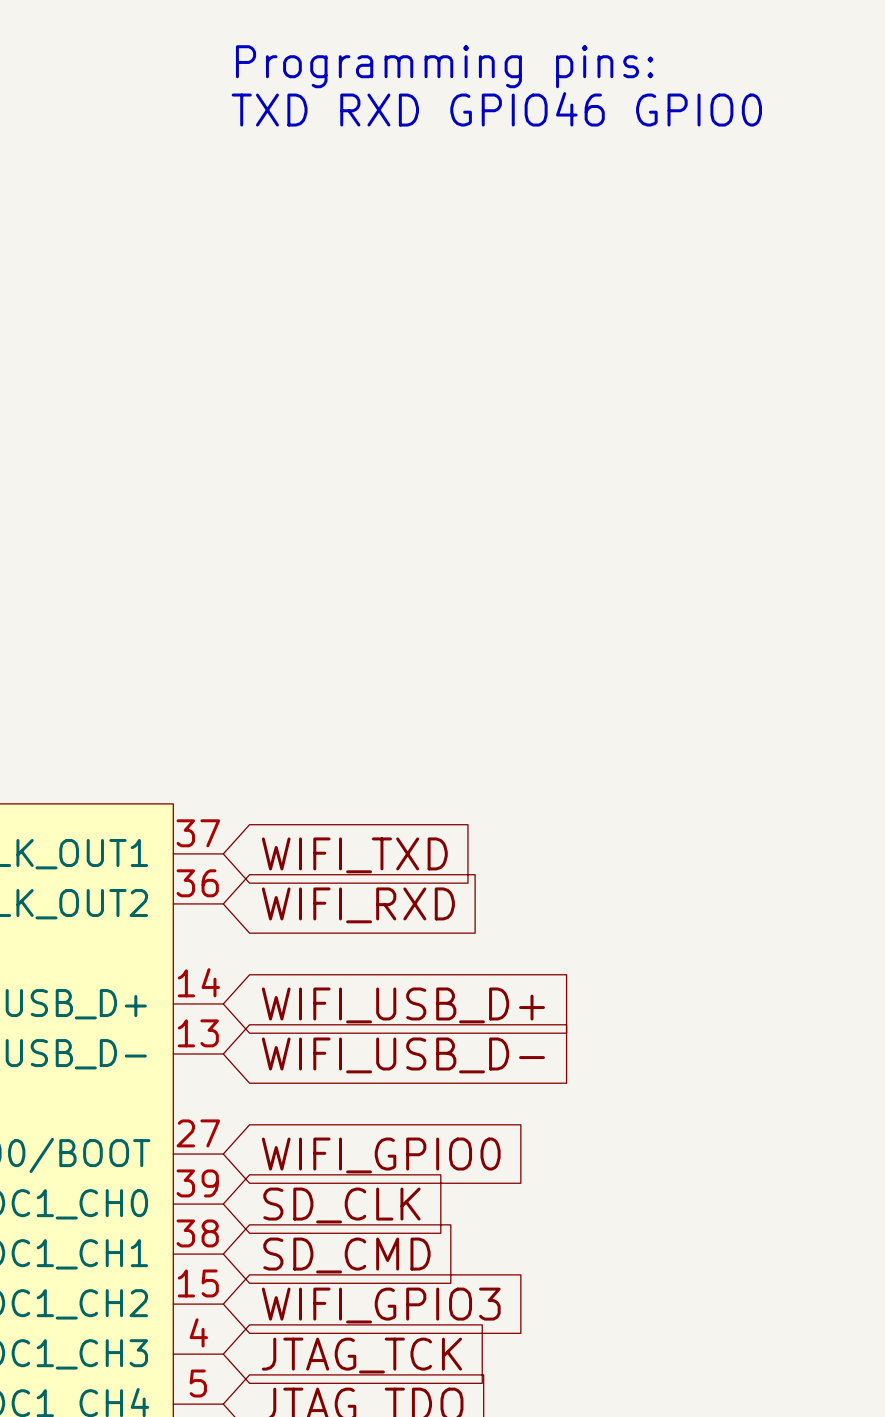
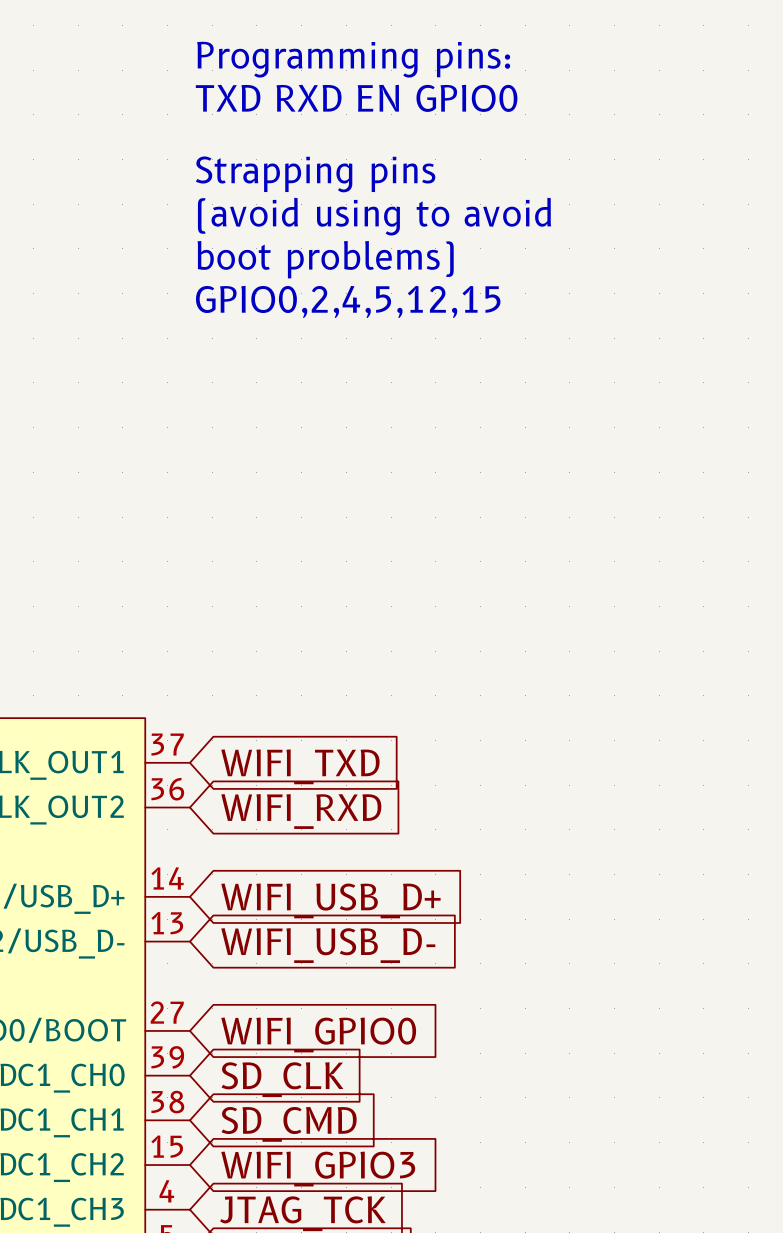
text: TXD RXD GPIO46 GPIO0 (496, 109) -> TXD RXD EN GPIO0 (356, 98)
text: none -> Strapping pins (315, 174)
text: none -> (avoid using to avoid (374, 216)
text: none -> boot problems) (325, 259)
text: none -> GPIO0,2,4,5,12,15 (348, 301)

